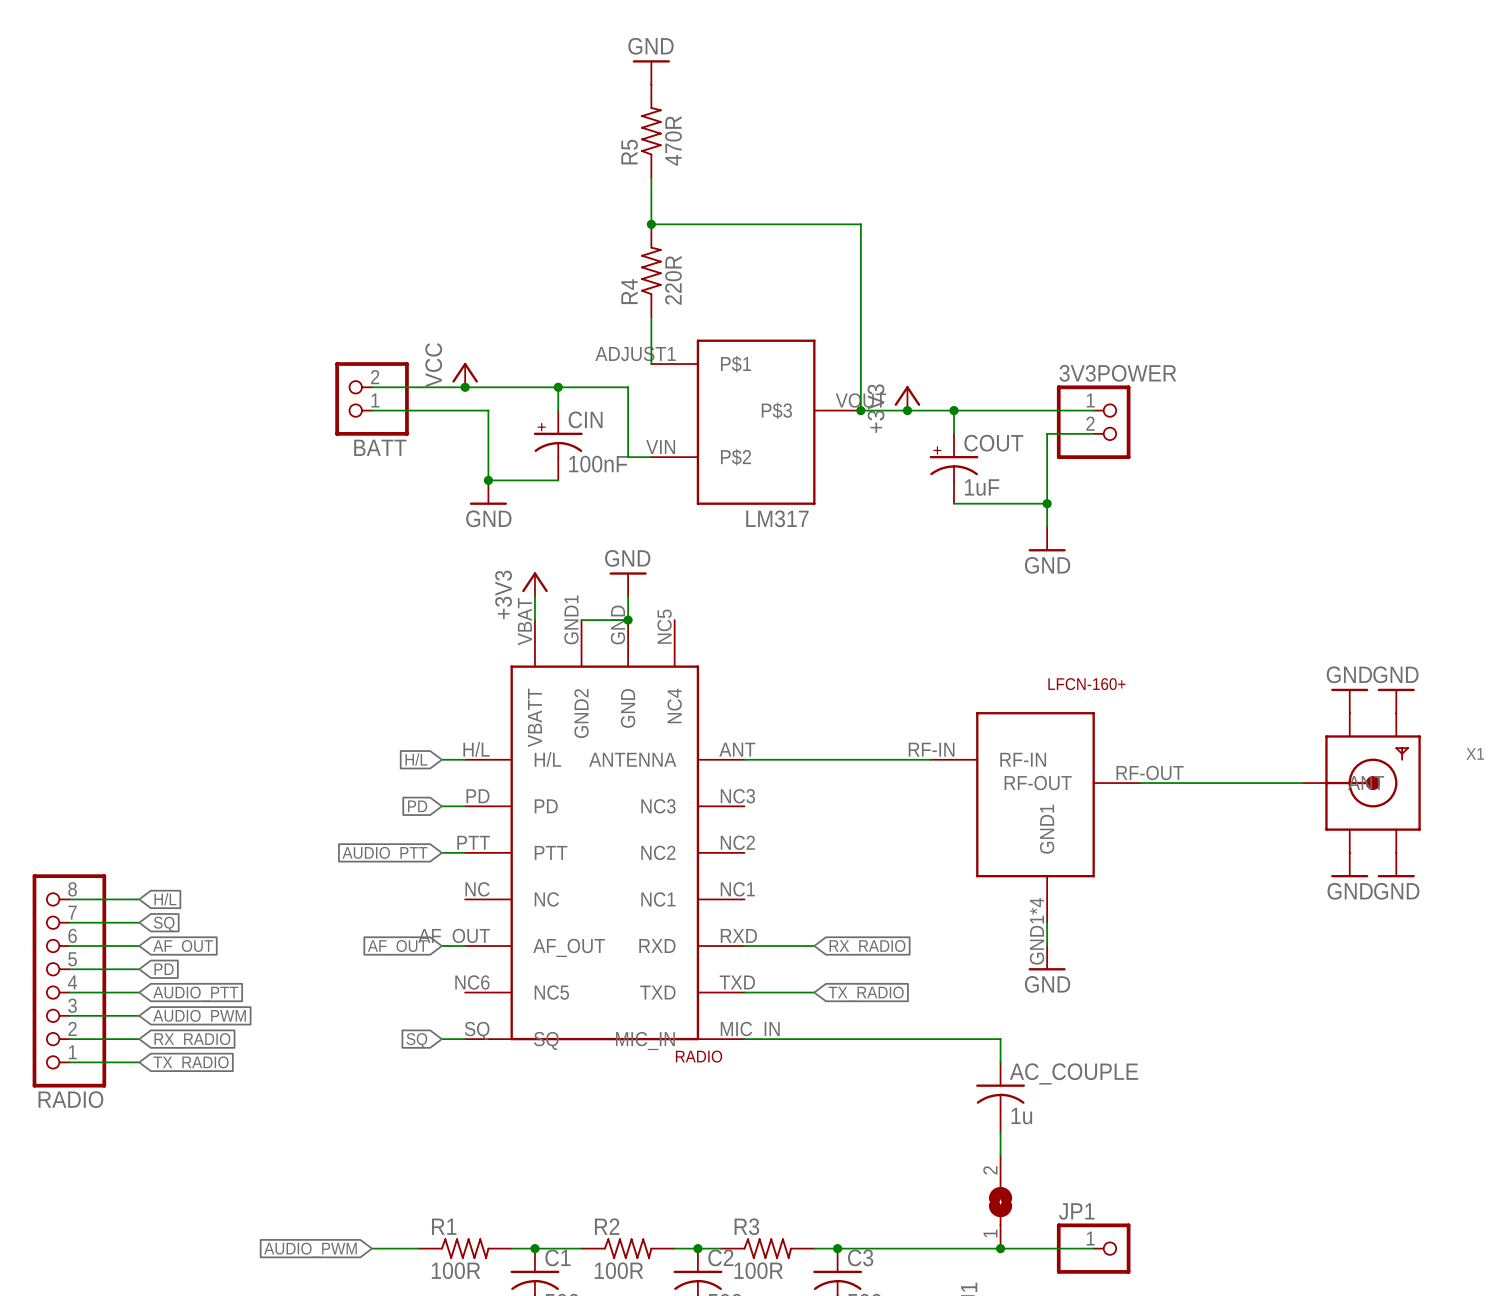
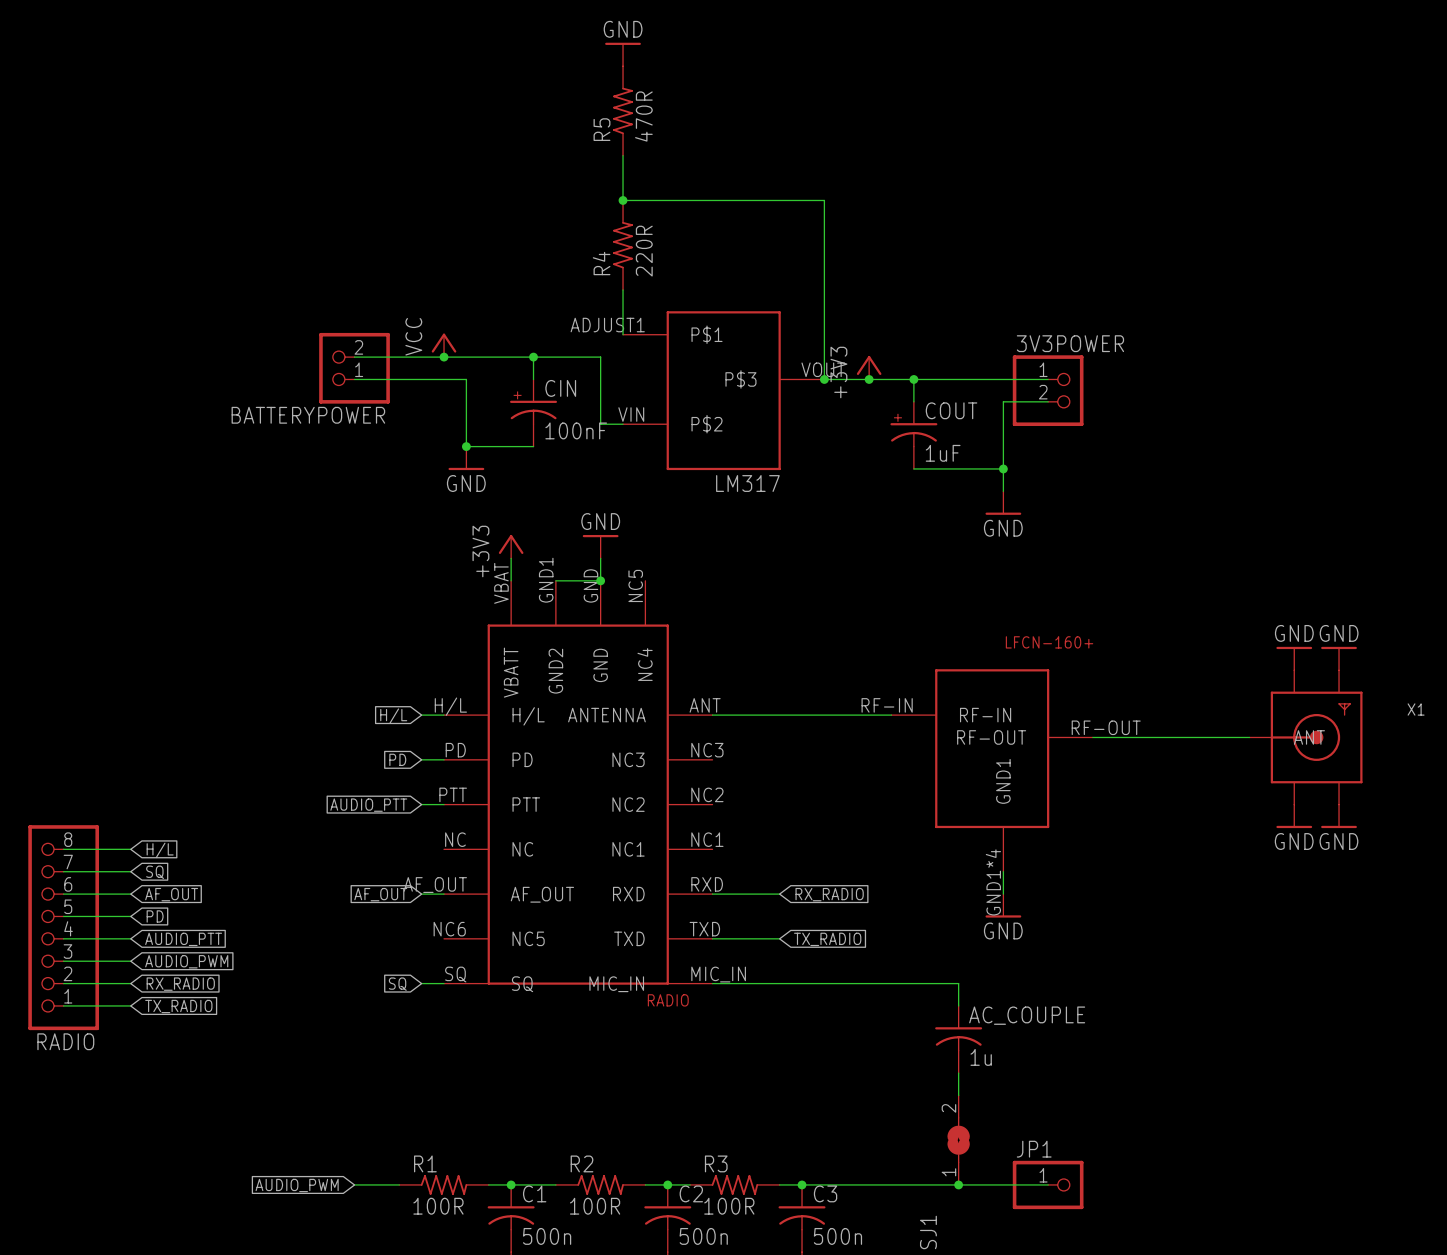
BATT name: BATT (380, 447) -> BATTERYPOWER (308, 415)

